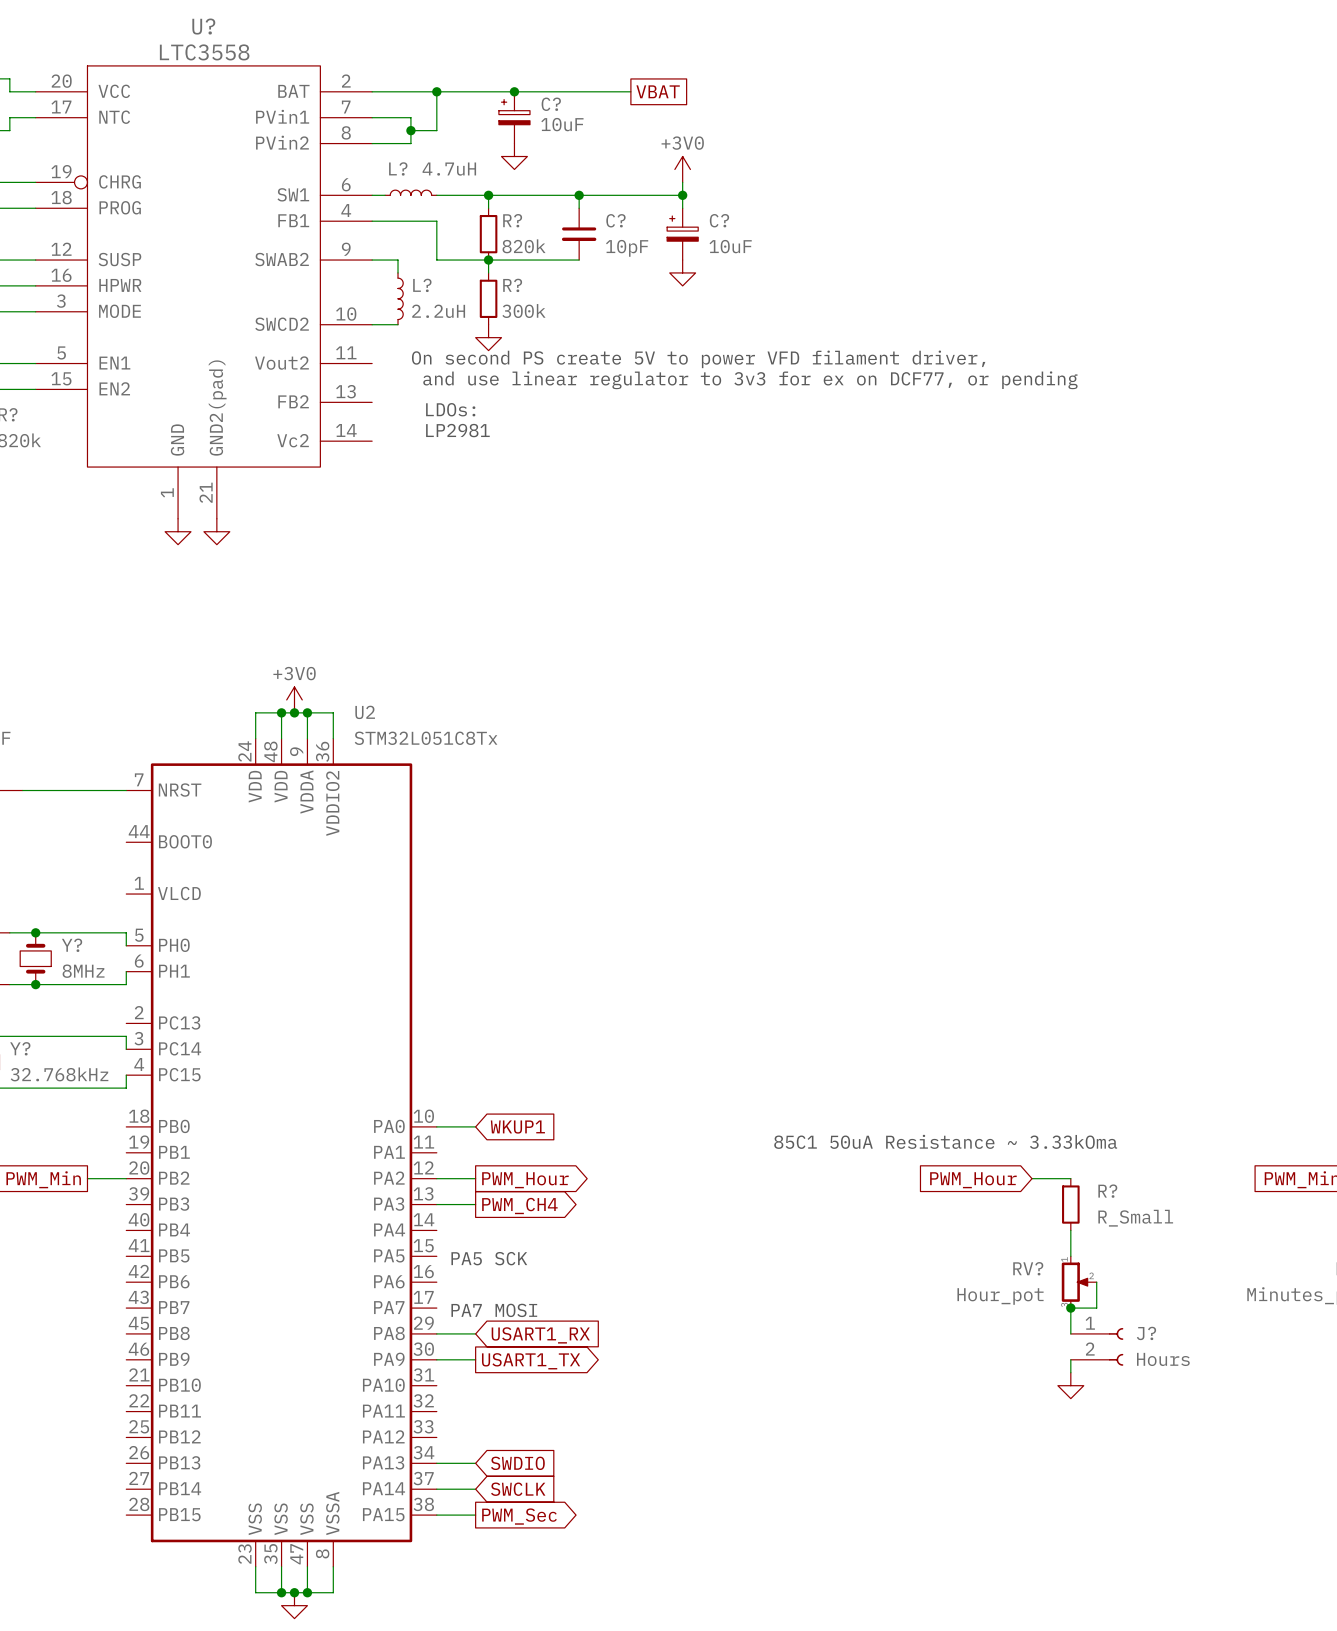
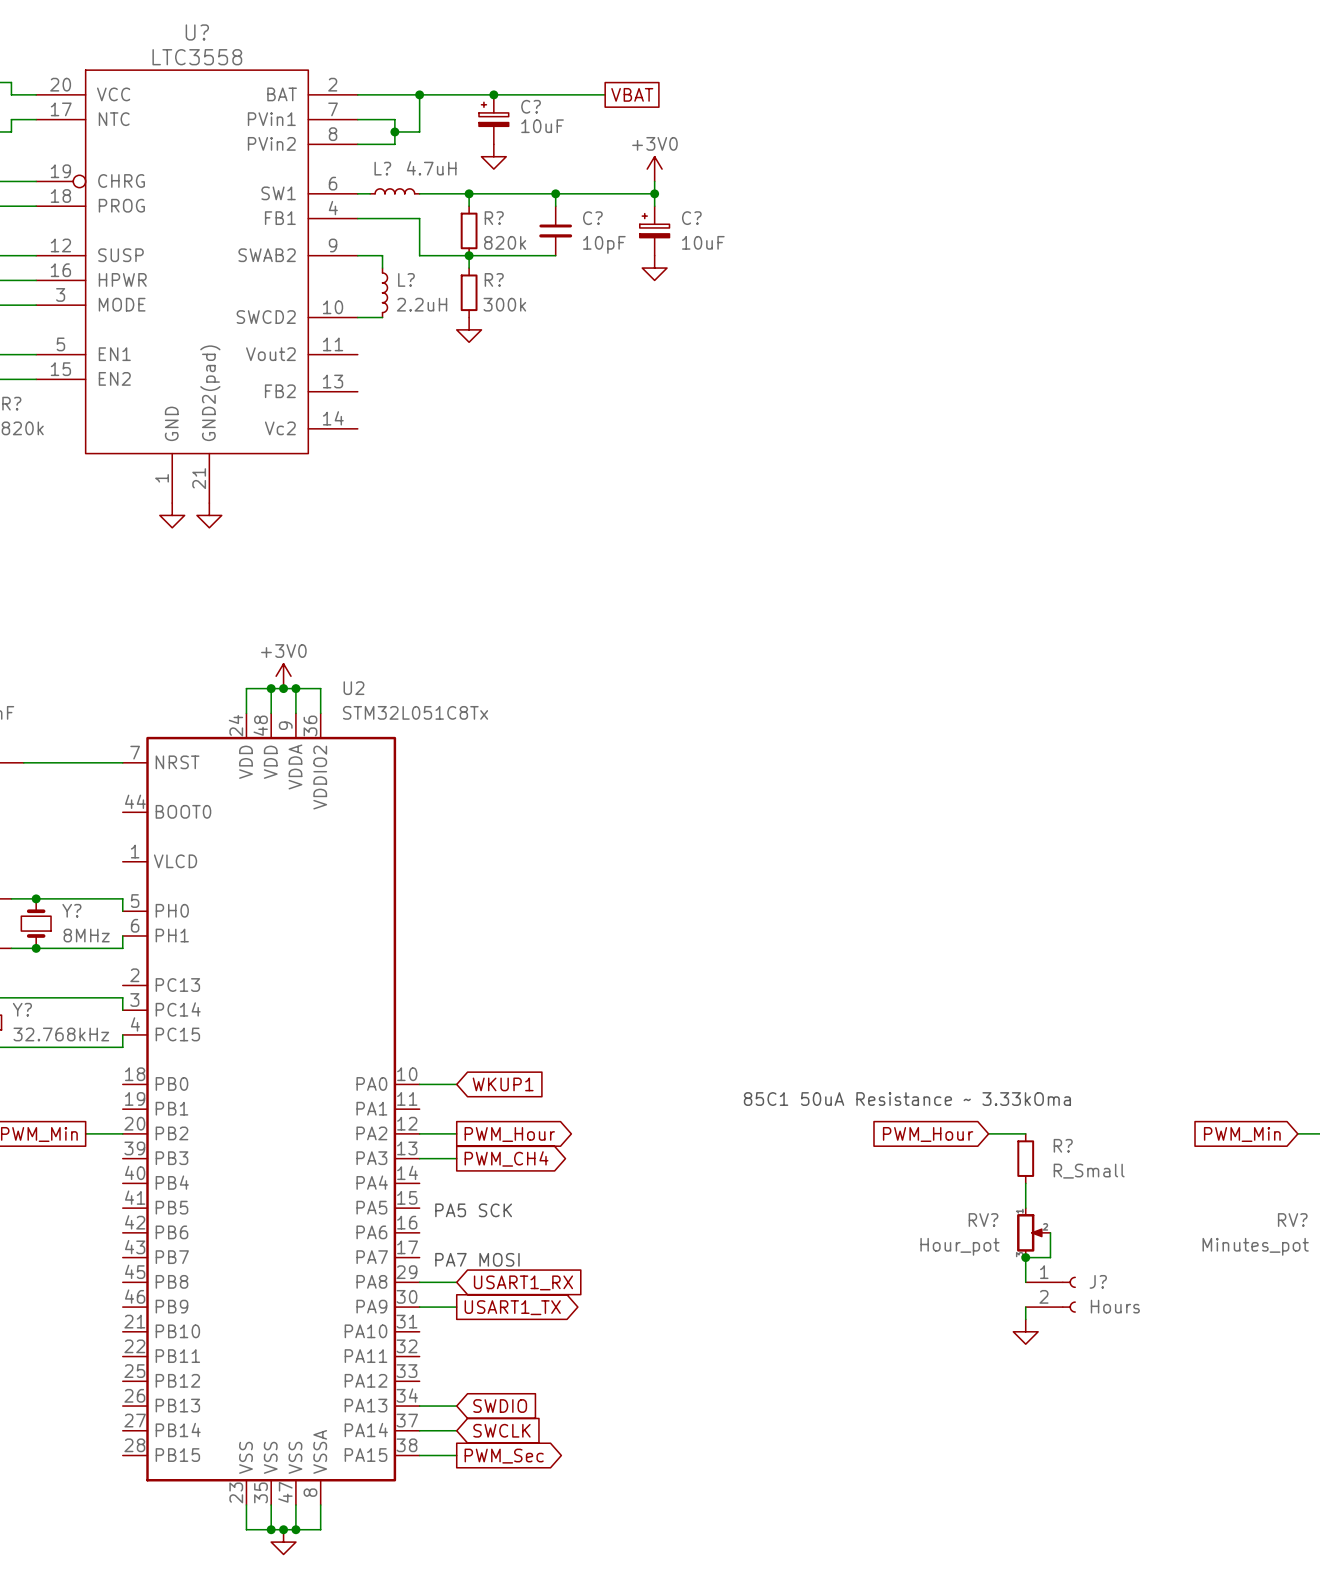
text: On second PS create 5V to power VFD filament driver, (698, 359) -> none
text: and use linear regulator to 3v3 for ex on DCF77, or pending (750, 380) -> none
text: LDOs: (450, 409) -> none
text: LP2981 (457, 430) -> none

